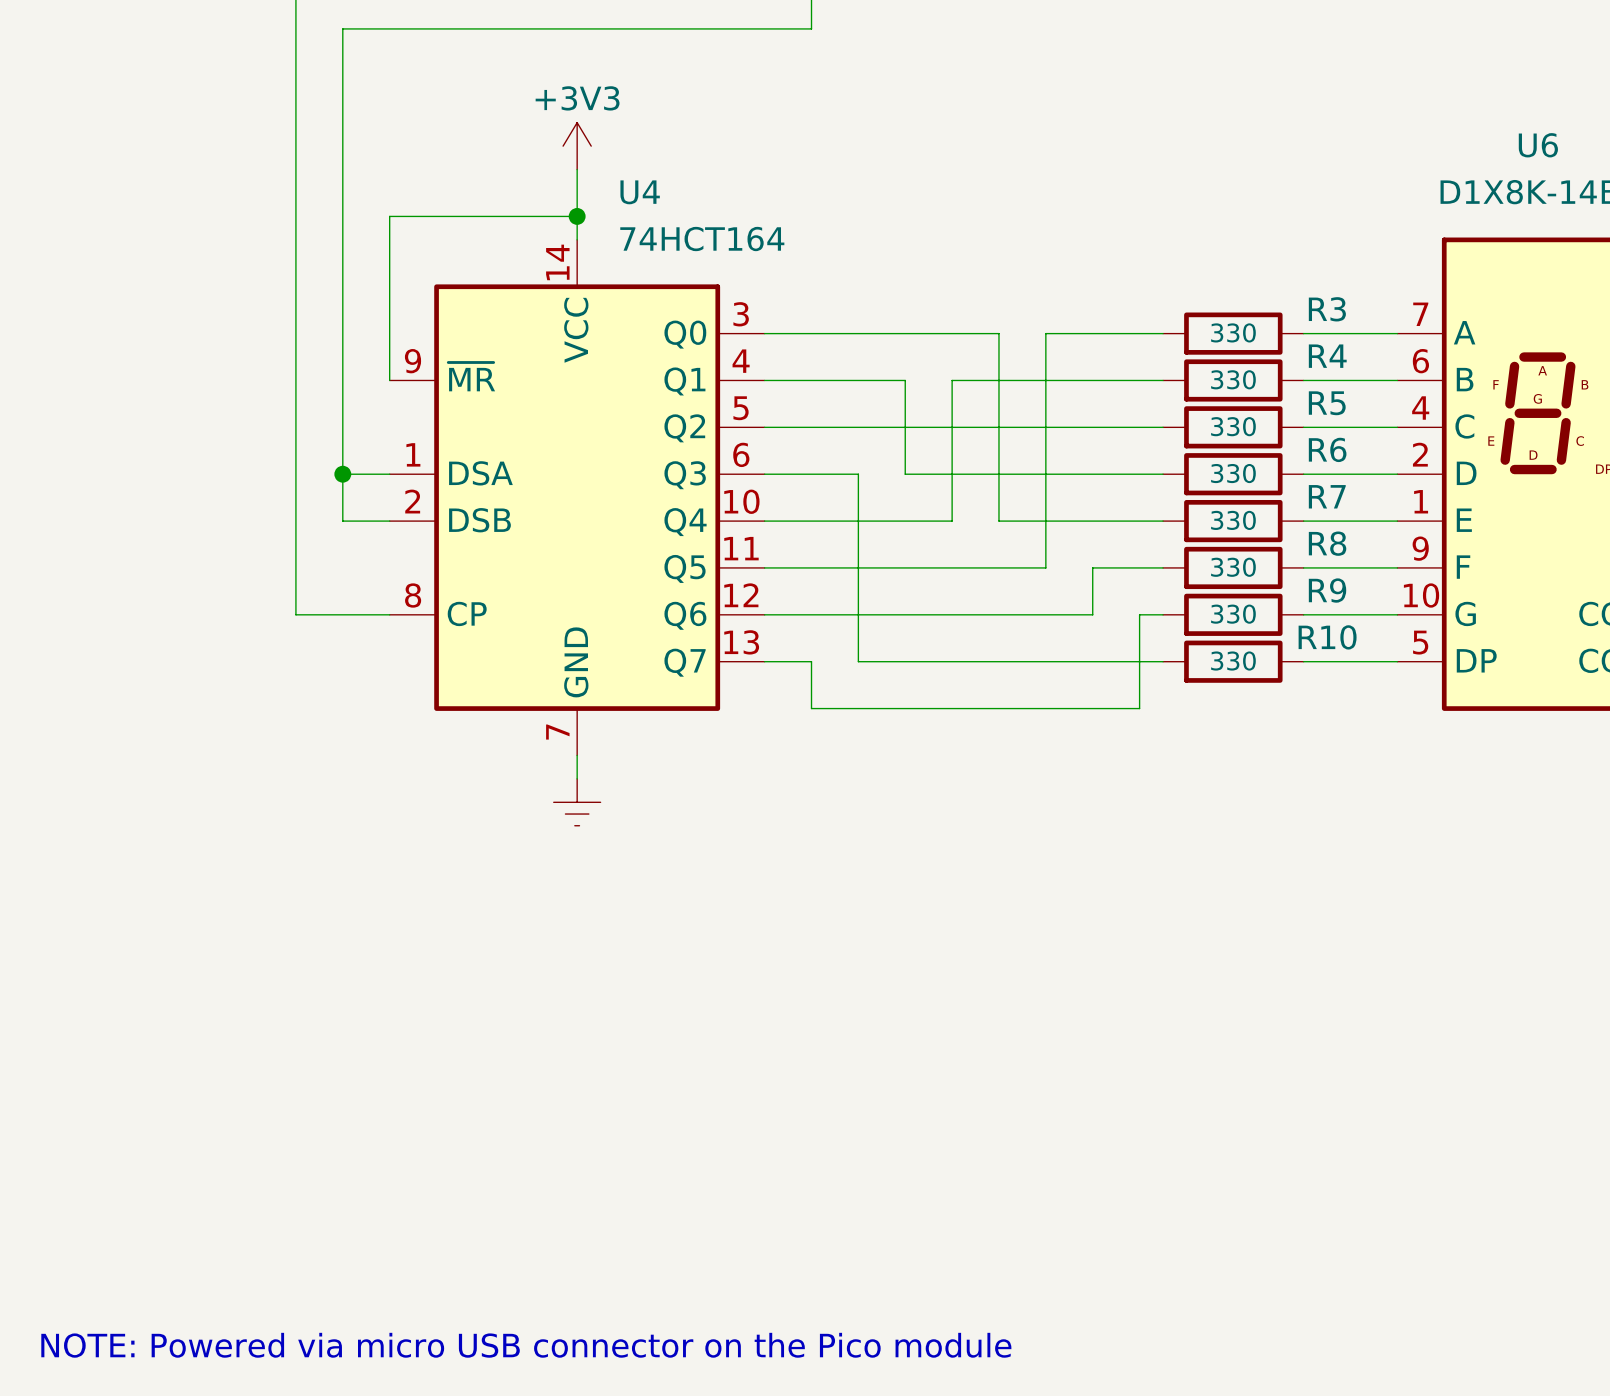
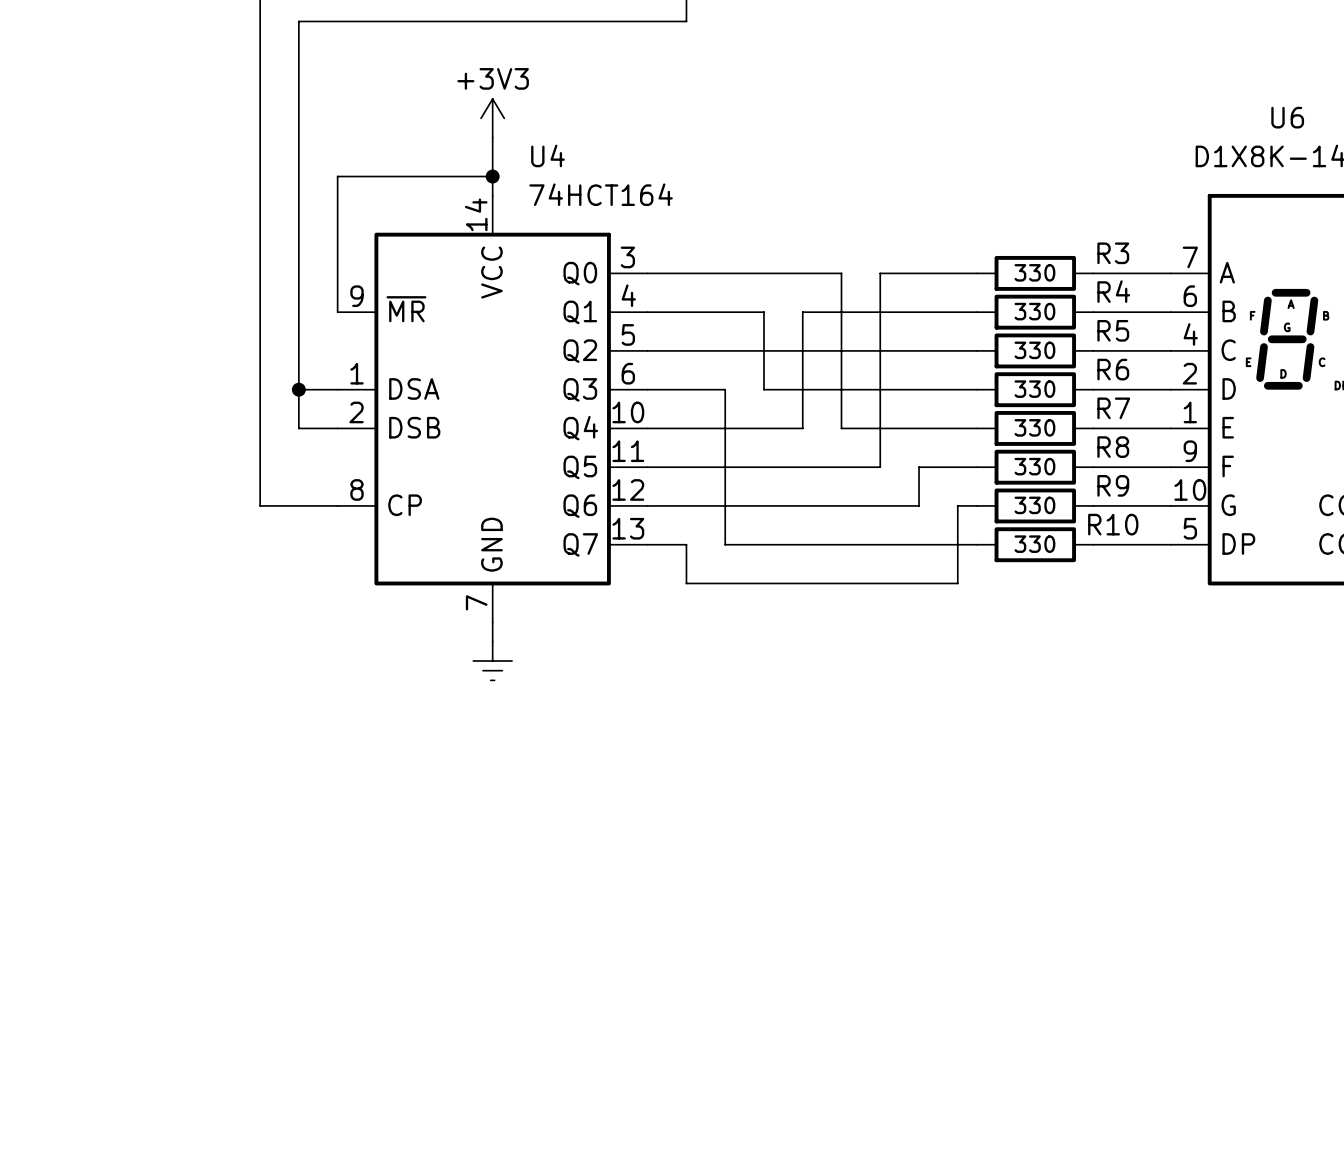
text: NOTE: Powered via micro USB connector on the Pico module (526, 1345) -> none

